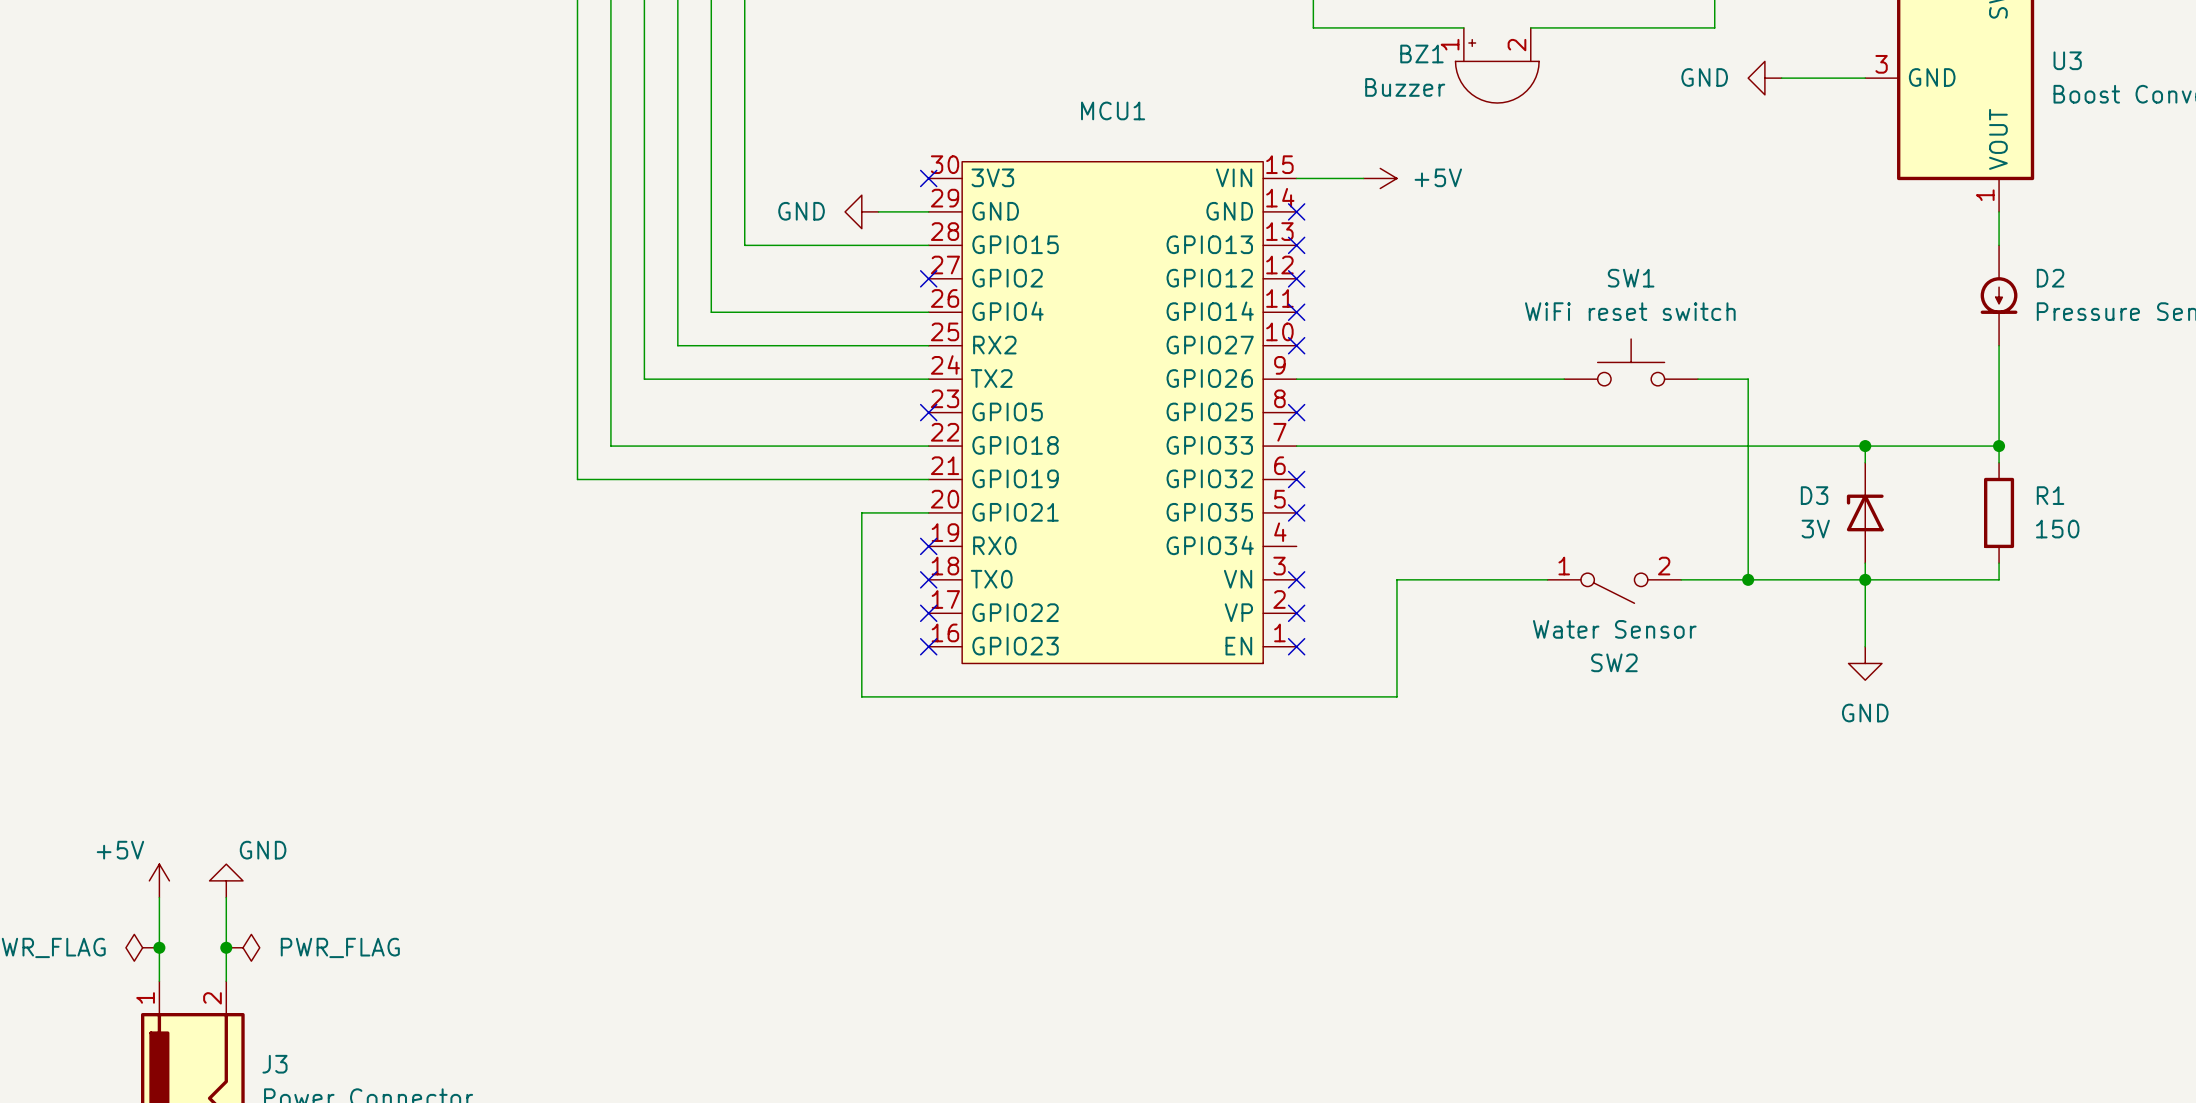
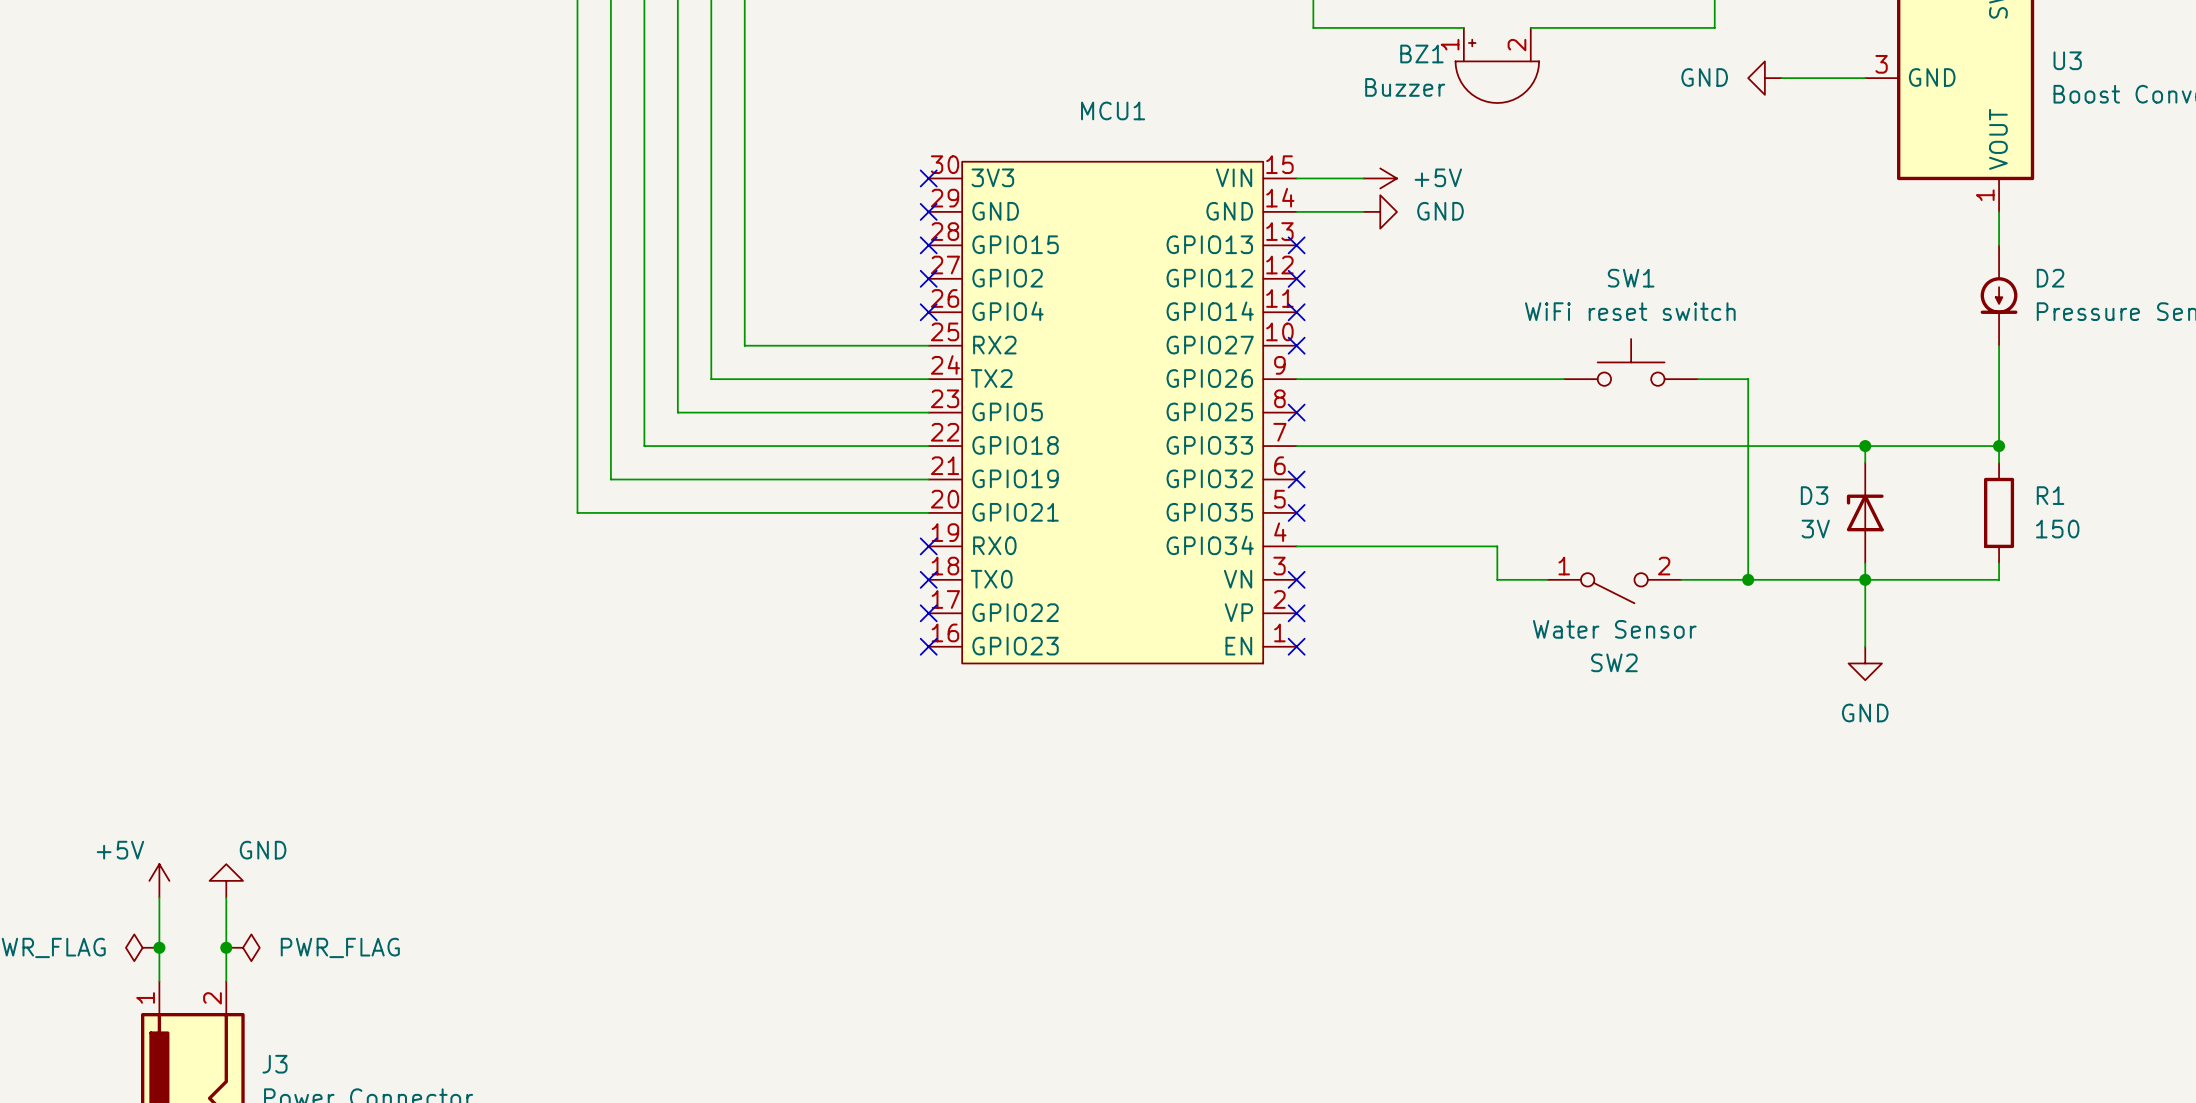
power symbol: GND (861, 211) -> none
wire: (878, 211) (928, 211) -> none
no-connect mark: none -> (928, 211)
wire: none -> (1296, 211) (1363, 211)
no-connect mark: (1296, 211) -> none
power symbol: none -> GND (1380, 211)
wire: (744, 245) (928, 245) -> none
no-connect mark: none -> (928, 245)
wire: (711, 312) (928, 312) -> none
no-connect mark: none -> (928, 312)
wire: (677, 345) (744, 345) -> (744, 245) (744, 345)
wire: none -> (677, 345) (677, 412) (928, 412)
wire: (644, 379) (711, 379) -> (711, 312) (711, 379)
wire: none -> (644, 379) (644, 446)
no-connect mark: (928, 412) -> none
wire: (610, 446) (644, 446) -> (610, 446) (610, 479)
wire: (577, 479) (610, 479) -> (577, 479) (577, 512) (861, 512)
wire: (861, 512) (861, 696) (1396, 696) (1396, 579) (1497, 579) -> (1296, 546) (1497, 546) (1497, 579)

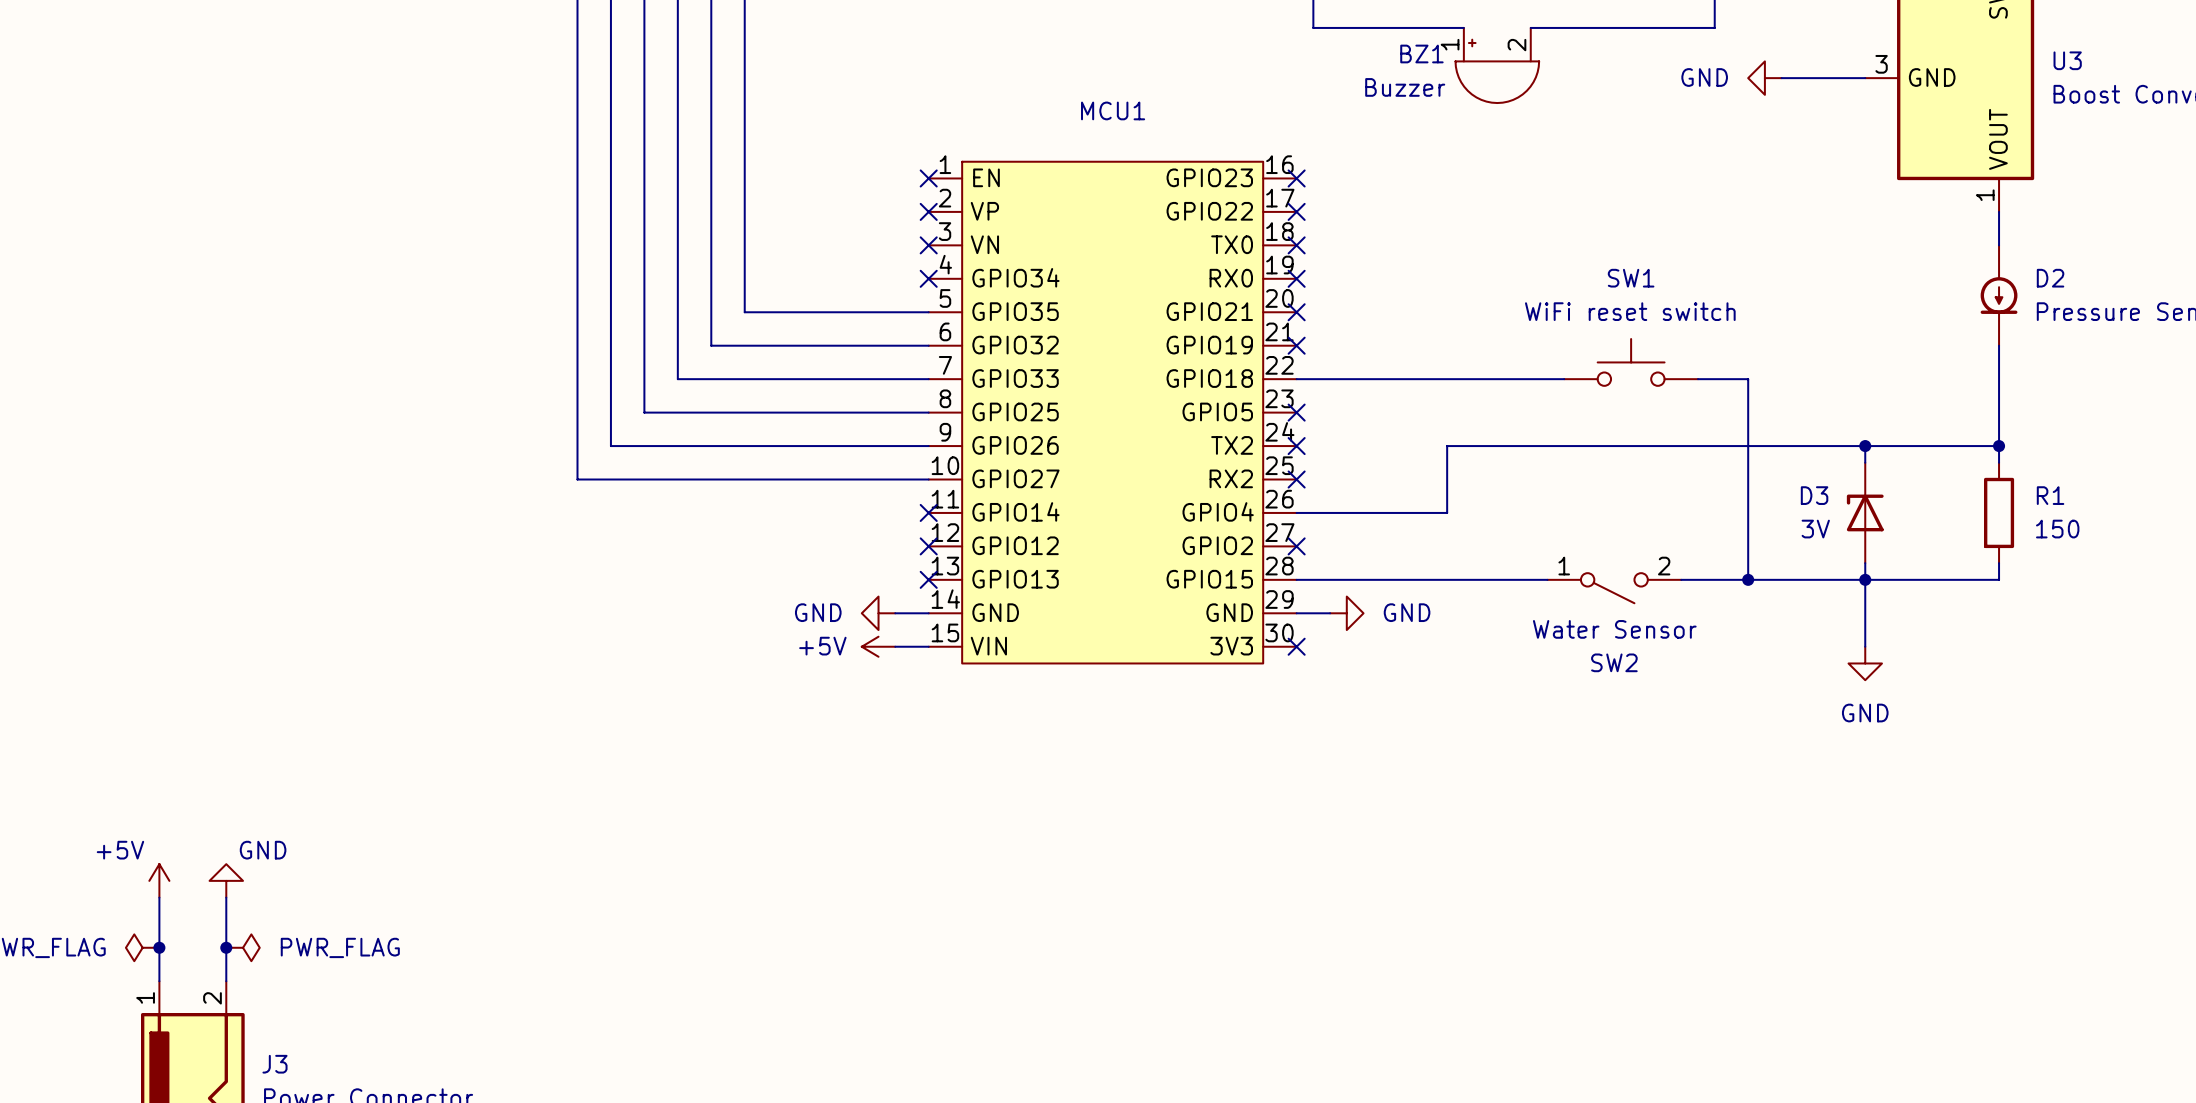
wire: (1296, 178) (1363, 178) -> none
no-connect mark: none -> (1296, 178)
power symbol: +5V (1380, 178) -> none
wire: (1296, 211) (1363, 211) -> none
no-connect mark: none -> (1296, 211)
power symbol: GND (1380, 211) -> none
wire: (744, 312) (744, 345) -> (744, 312) (928, 312)
no-connect mark: (928, 312) -> none
wire: (711, 345) (711, 379) -> (711, 345) (744, 345)
wire: (677, 379) (677, 412) -> (677, 379) (711, 379)
wire: (644, 412) (644, 446) -> (644, 412) (677, 412)
MCU1 rotation: 0° (1112, 412) -> 180° (1112, 412)
wire: (610, 446) (610, 479) -> (610, 446) (644, 446)
wire: (1296, 446) (1447, 446) -> (1296, 512) (1447, 512) (1447, 446)
no-connect mark: none -> (1296, 446)
wire: (577, 479) (577, 512) (928, 512) -> (577, 479) (610, 479)
no-connect mark: none -> (928, 512)
no-connect mark: (1296, 512) -> none
wire: (1296, 546) (1497, 546) (1497, 579) -> (1296, 579) (1497, 579)
no-connect mark: none -> (1296, 546)
no-connect mark: (1296, 579) -> none
power symbol: none -> GND (878, 613)
wire: none -> (895, 613) (928, 613)
no-connect mark: (928, 613) -> none
wire: none -> (1296, 613) (1330, 613)
no-connect mark: (1296, 613) -> none
power symbol: none -> GND (1346, 613)
power symbol: none -> +5V (878, 646)
wire: none -> (895, 646) (928, 646)
no-connect mark: (928, 646) -> none

